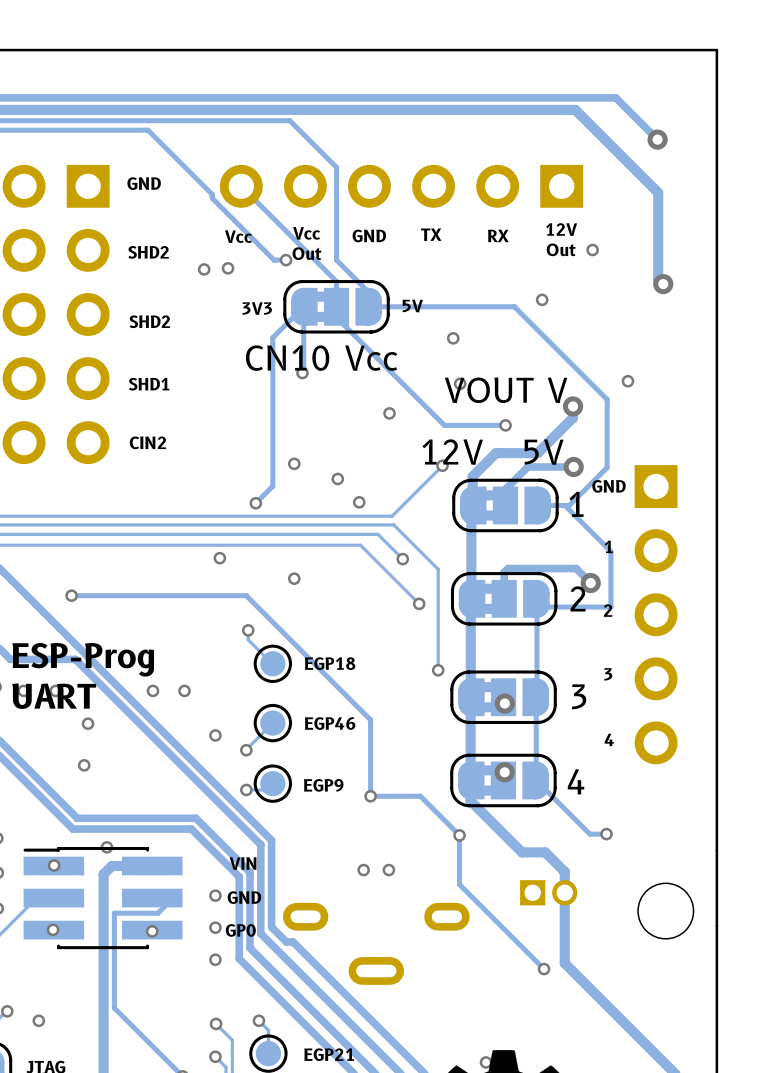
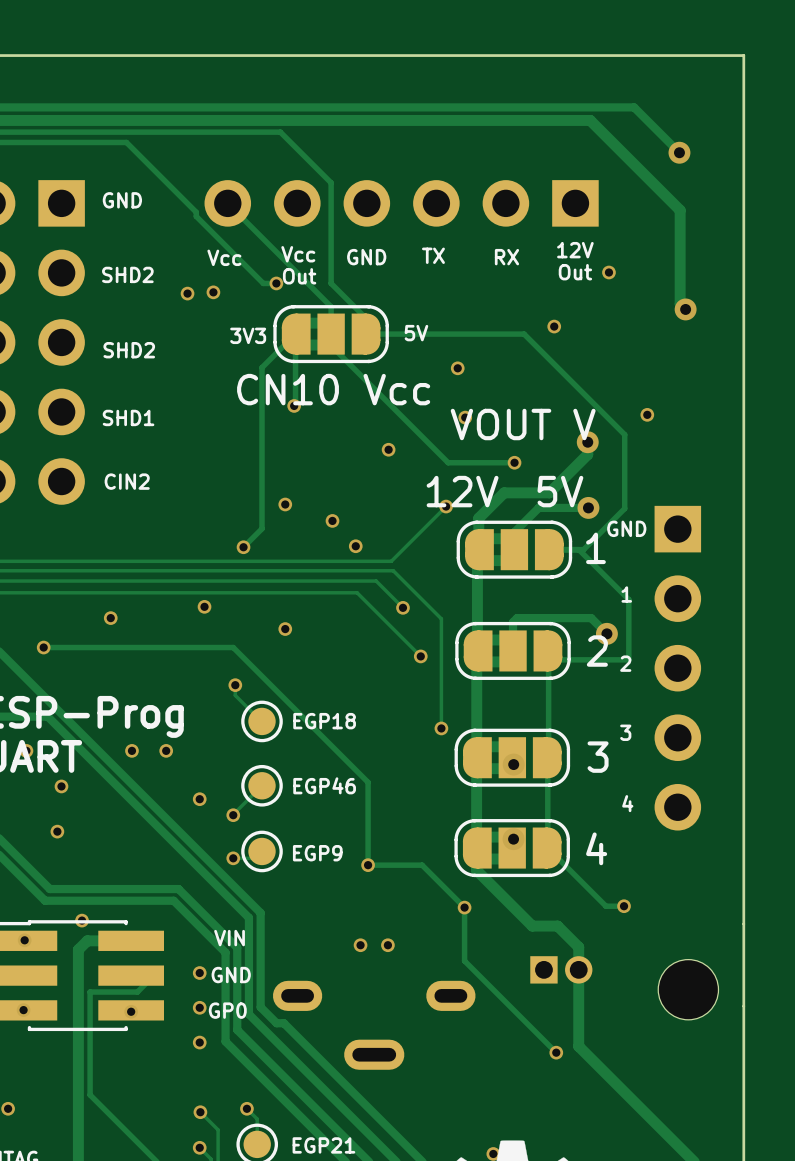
via: none -> (110, 618)

